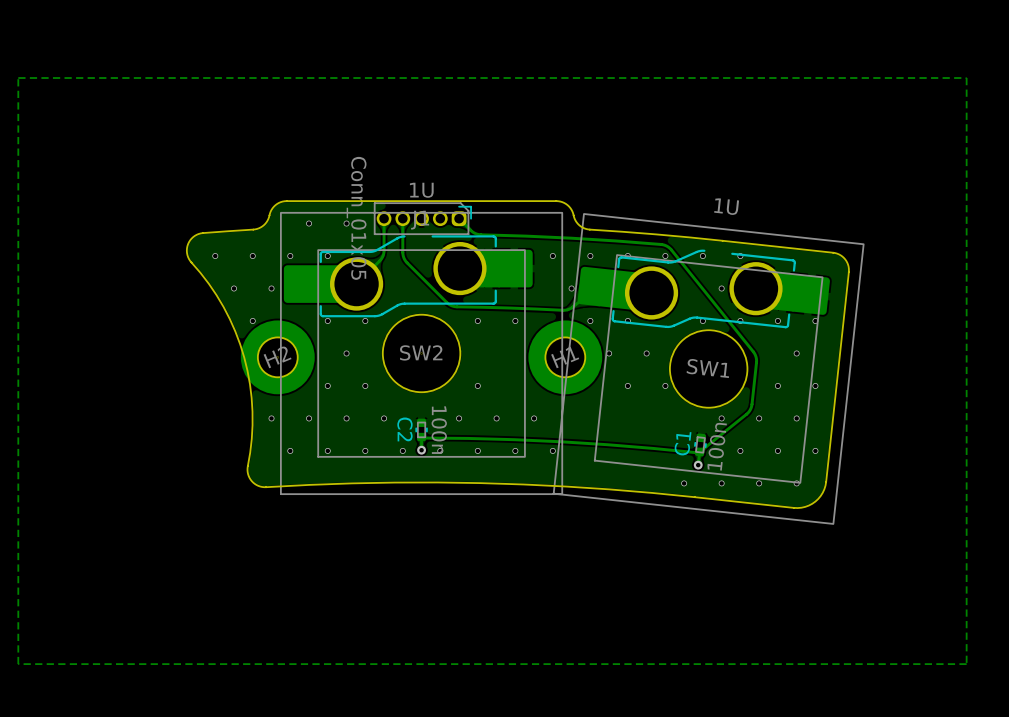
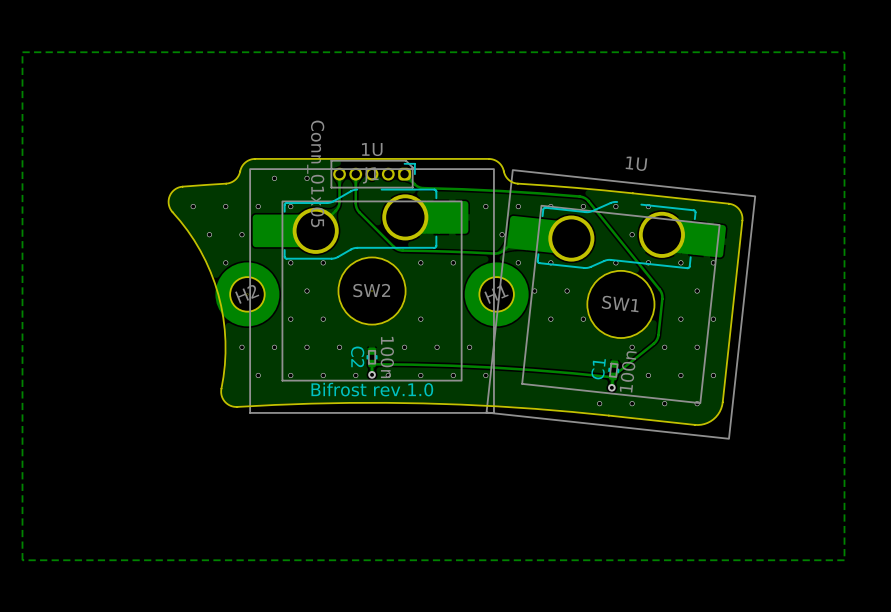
text: none -> Bifrost rev.1.0 (372, 389)

